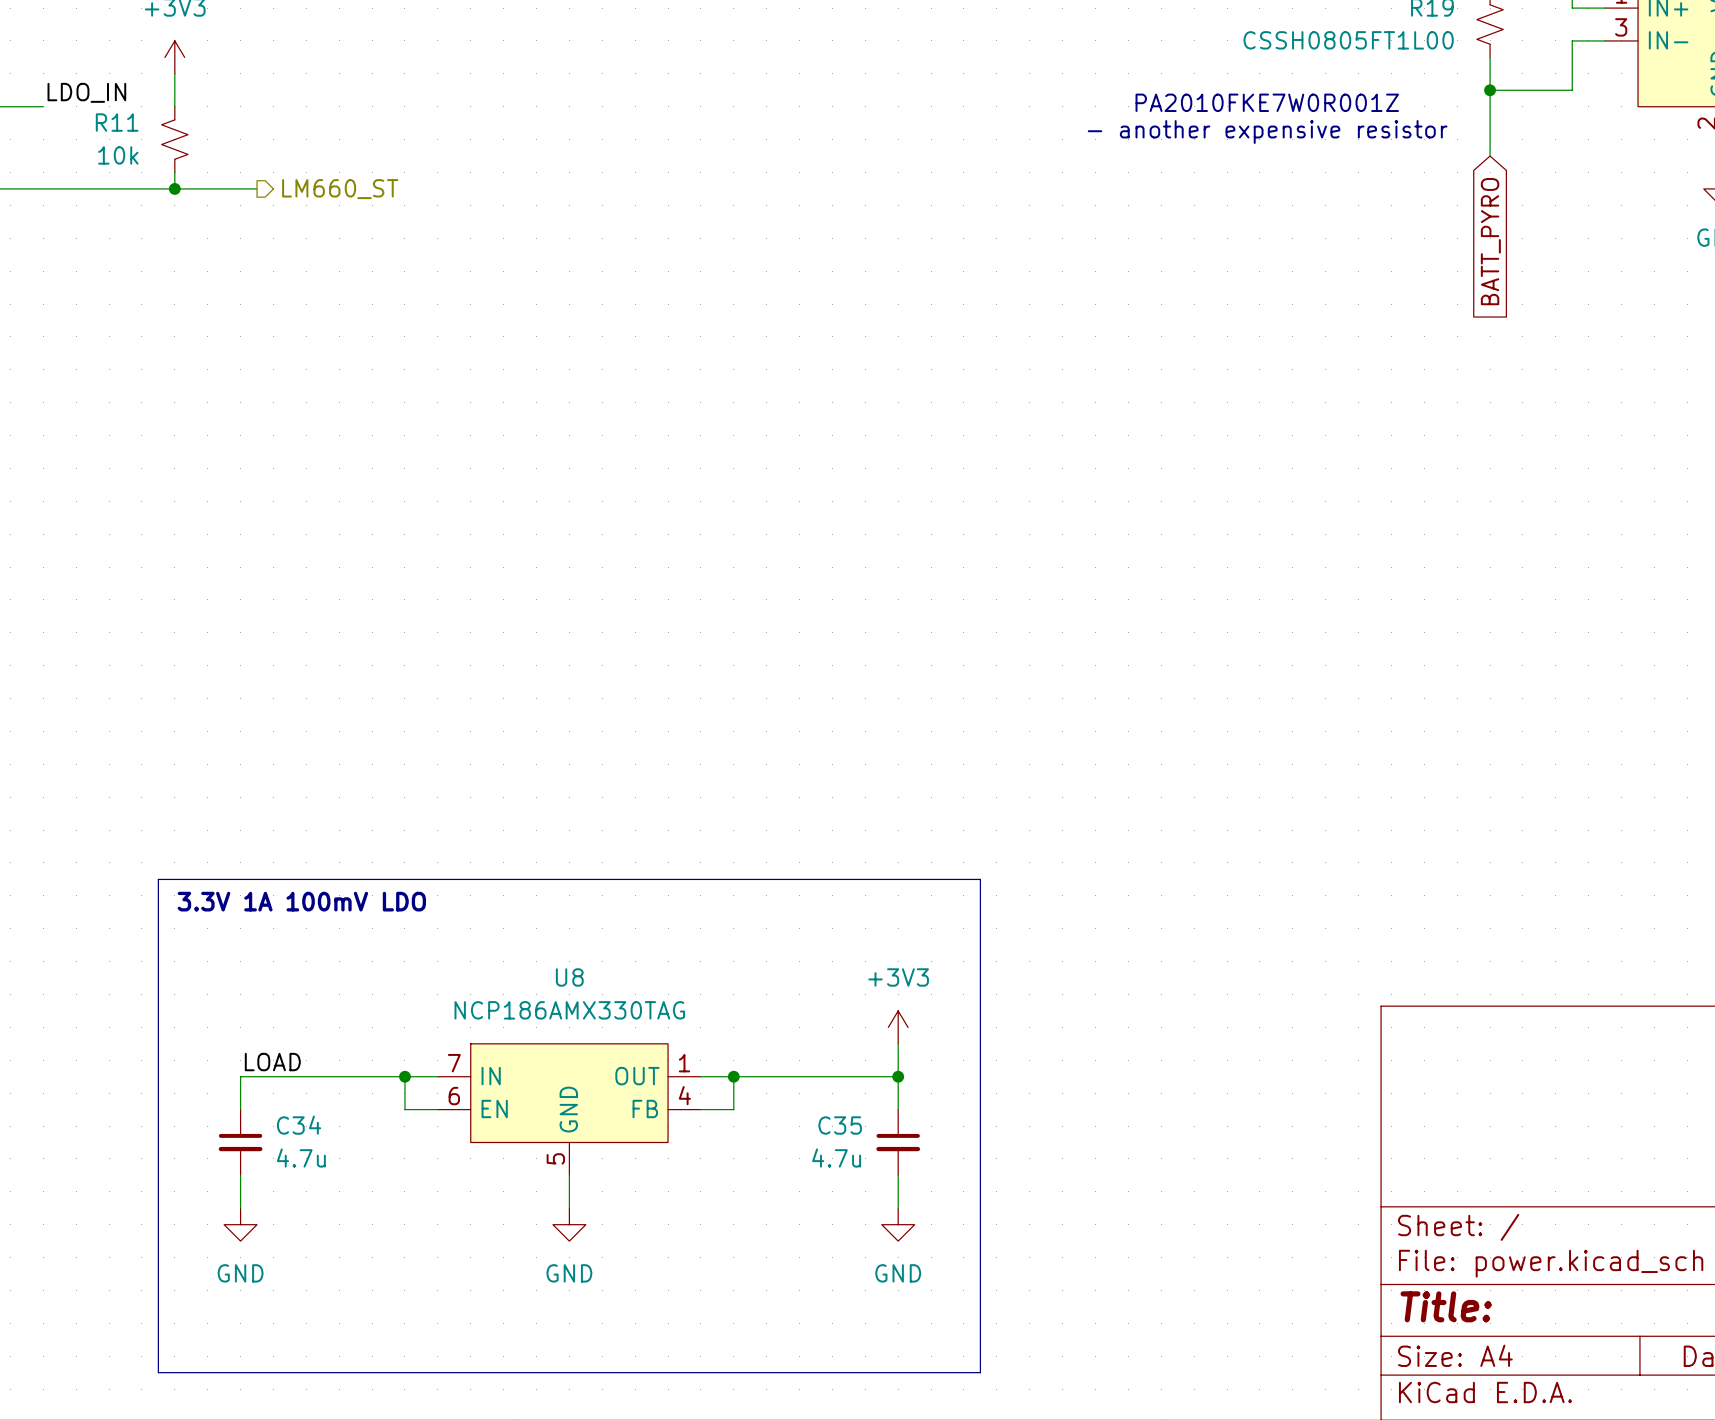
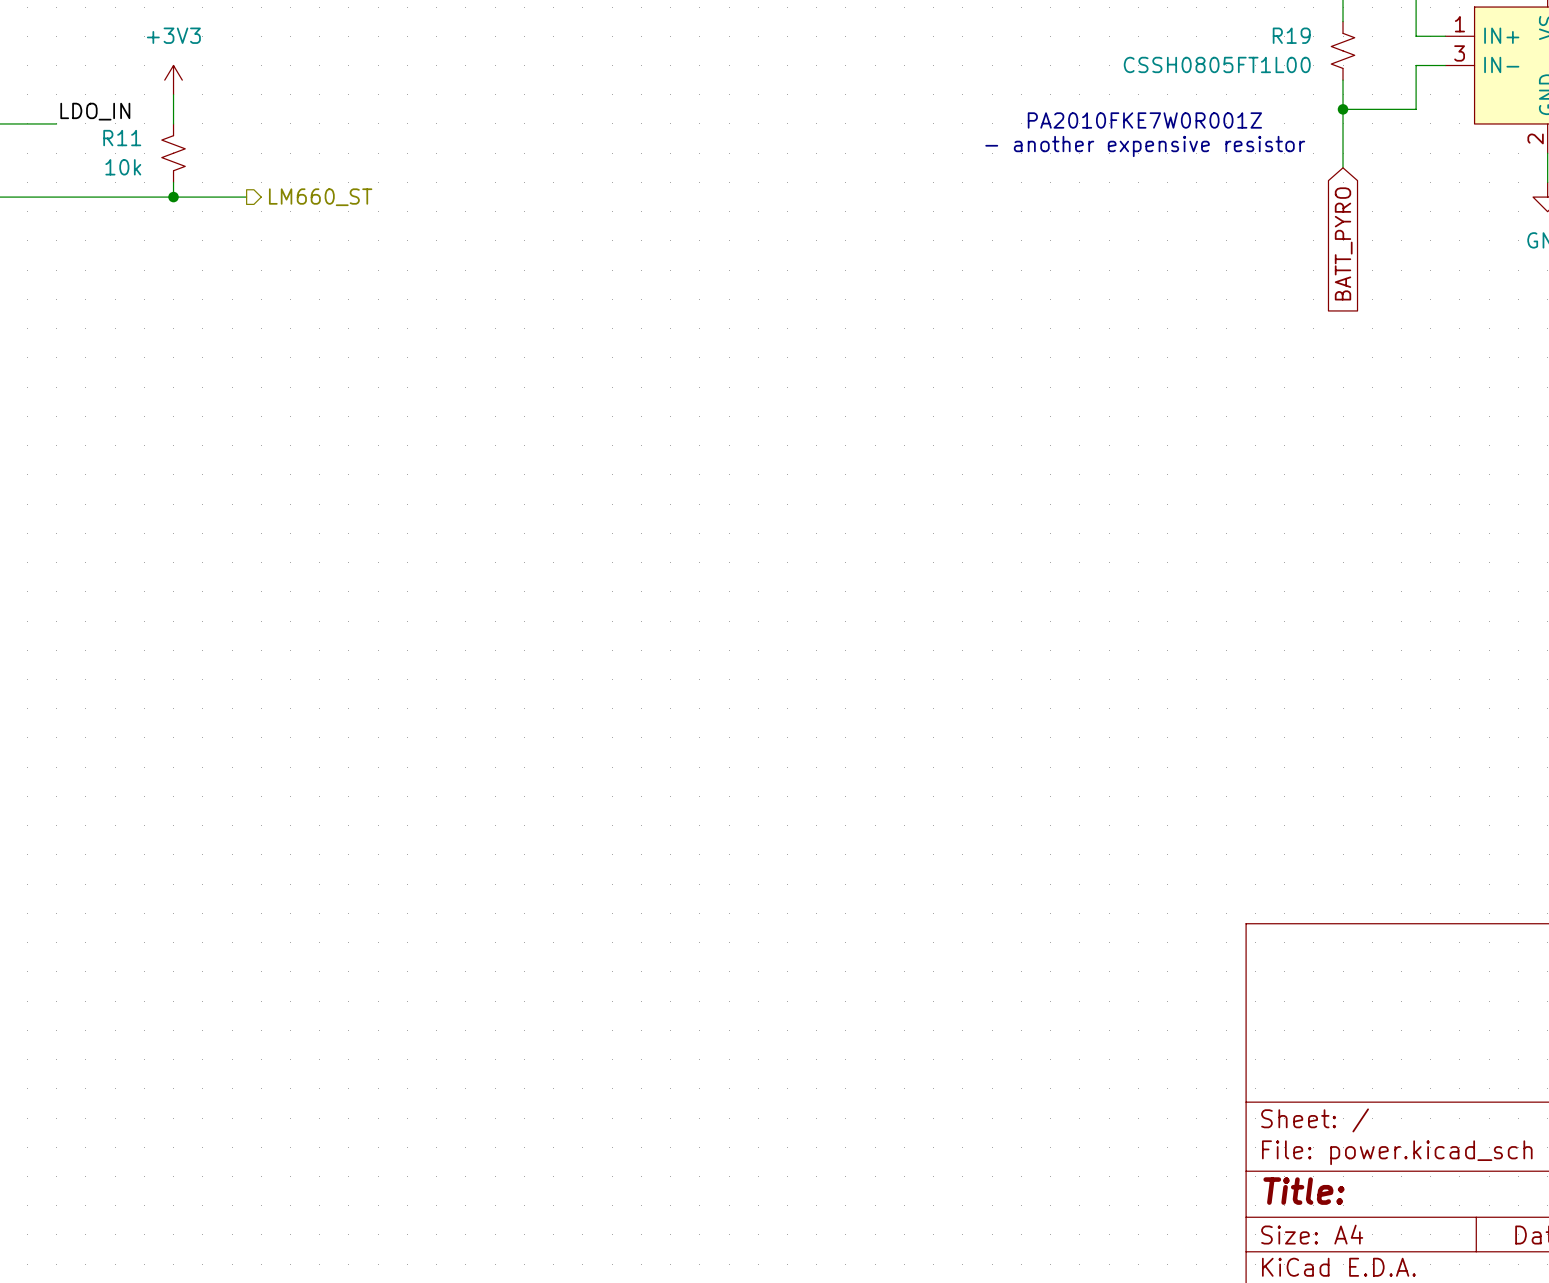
line: (158, 879) (980, 879) (980, 1372) (158, 1372) (158, 879) -> none
text: 3.3V 1A 100mV LDO (301, 901) -> none
power symbol: +3V3 (898, 1027) -> none
wire: (898, 1043) (898, 1109) -> none
label: LOAD (272, 1062) -> none
wire: (404, 1076) (404, 1109) (437, 1109) -> none
junction: (404, 1076) -> none
wire: (437, 1076) (240, 1076) (240, 1109) -> none
wire: (700, 1076) (898, 1076) -> none
wire: (733, 1076) (733, 1109) (700, 1109) -> none
junction: (733, 1076) -> none
junction: (898, 1076) -> none
U8: NCP186AMX330TAG (569, 1109) -> none
C34: 4.7u (240, 1142) -> none
C35: 4.7u (898, 1142) -> none
wire: (240, 1175) (240, 1208) -> none
wire: (569, 1175) (569, 1208) -> none
wire: (898, 1175) (898, 1208) -> none
power symbol: GND (240, 1224) -> none
power symbol: GND (569, 1224) -> none
power symbol: GND (898, 1224) -> none

